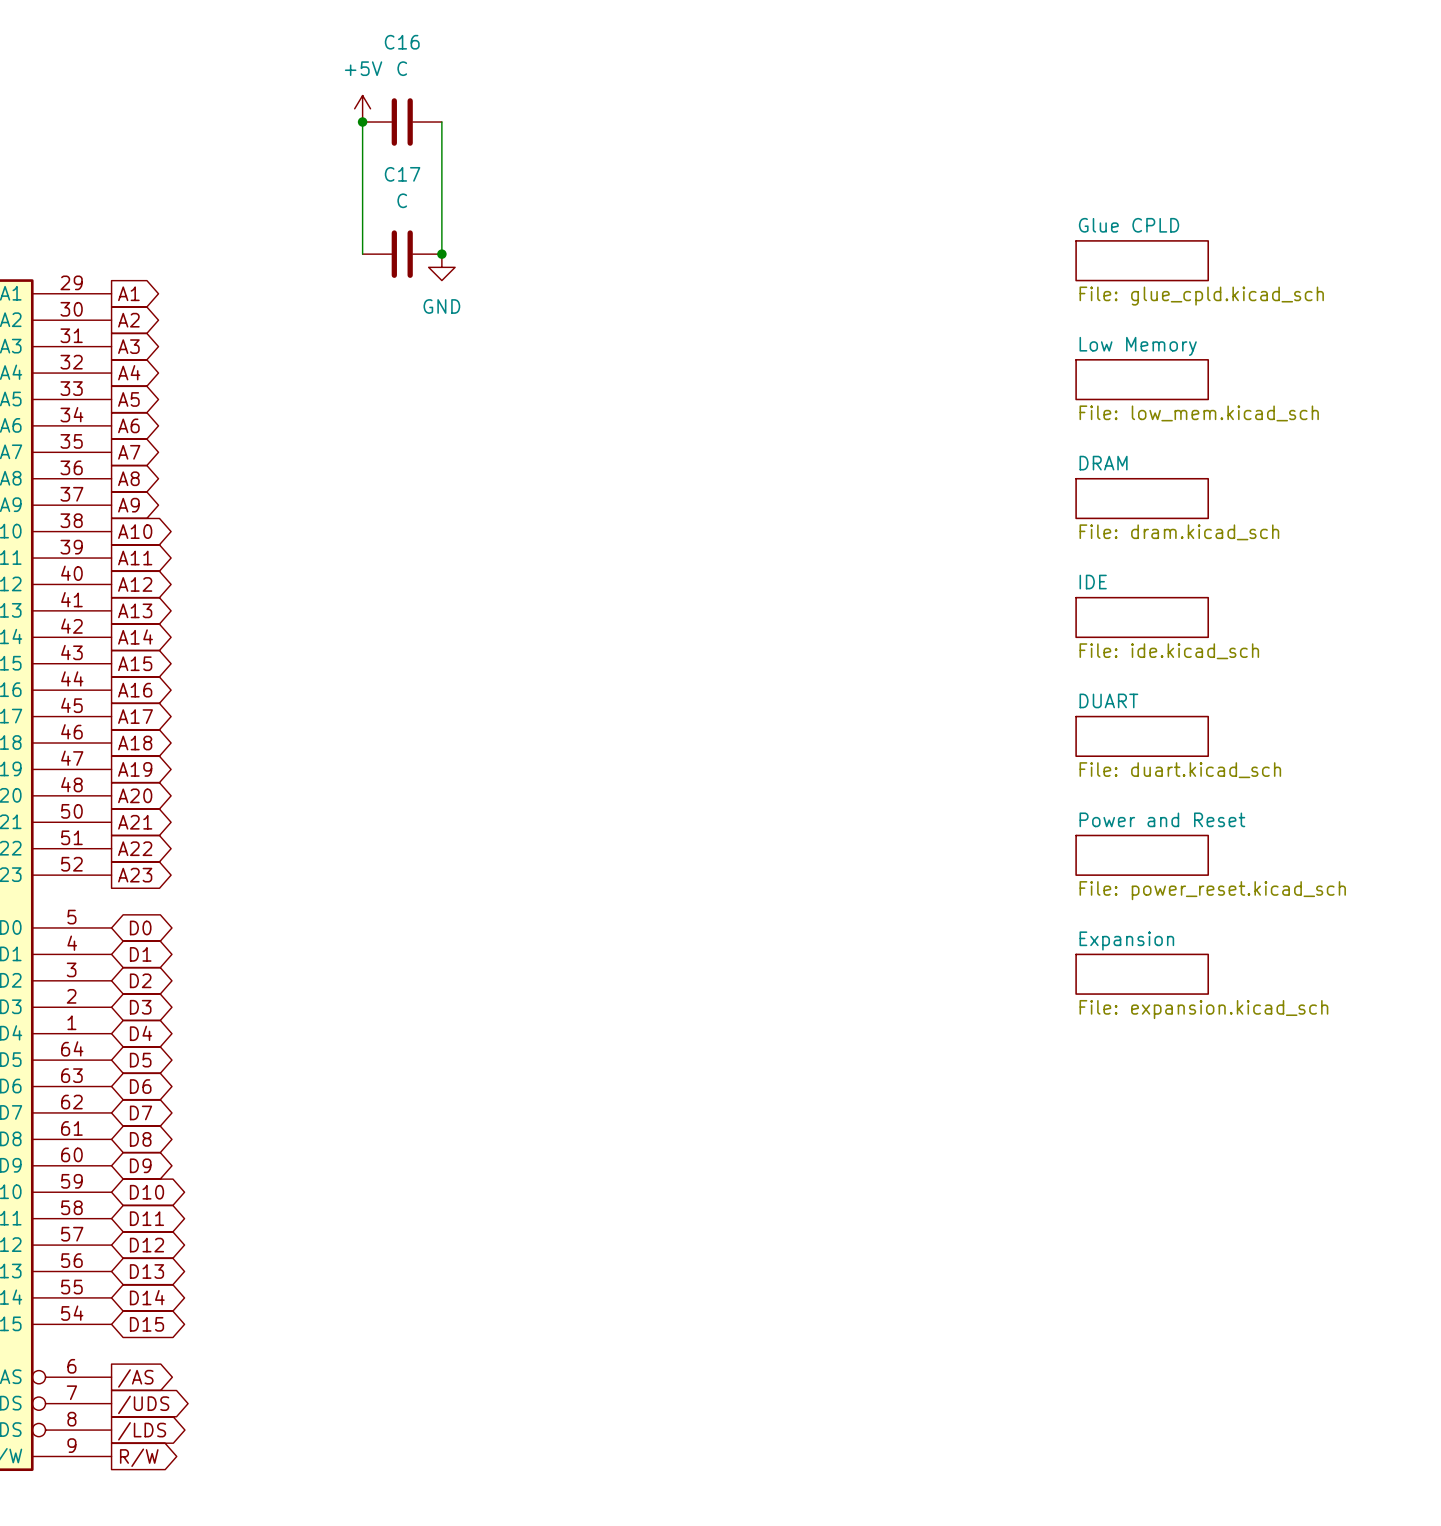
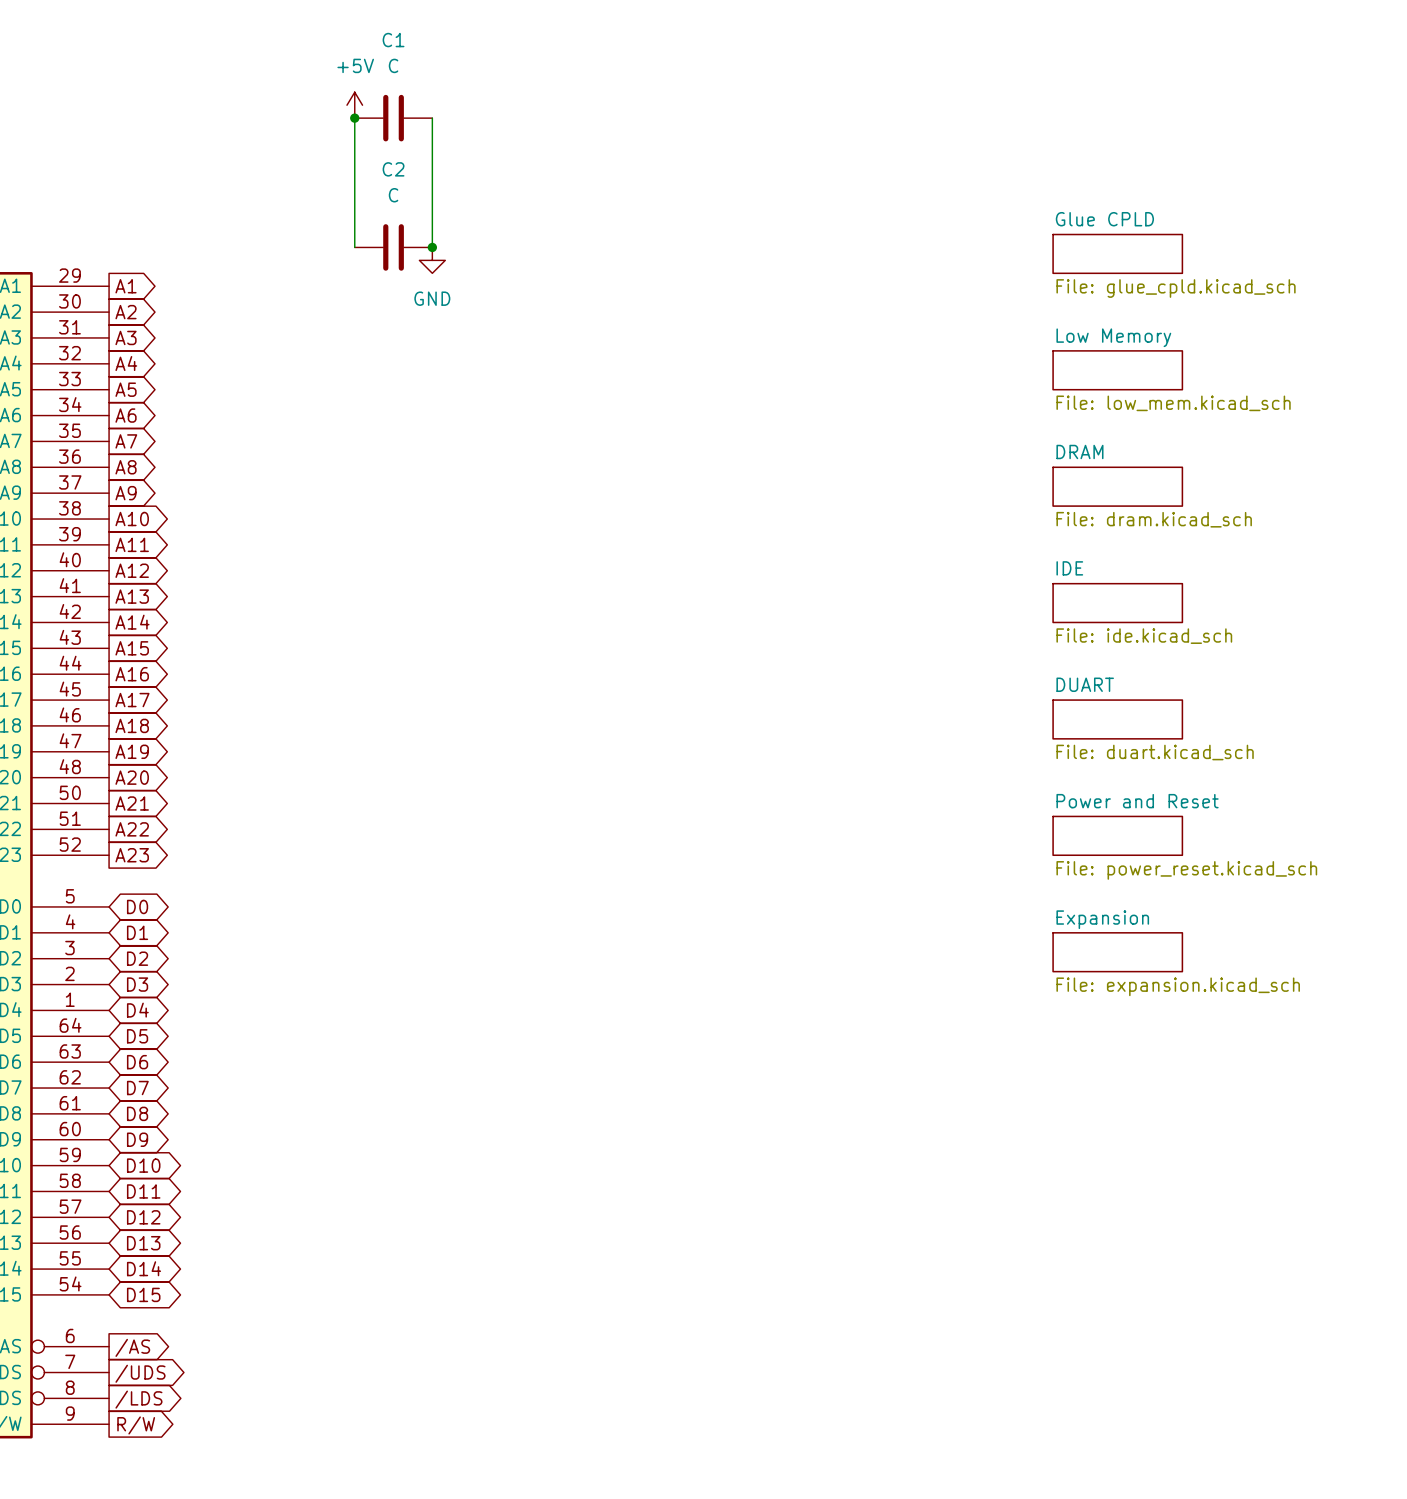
C16 name: C16 (402, 42) -> C1 (393, 40)
C17 name: C17 (402, 174) -> C2 (393, 169)

